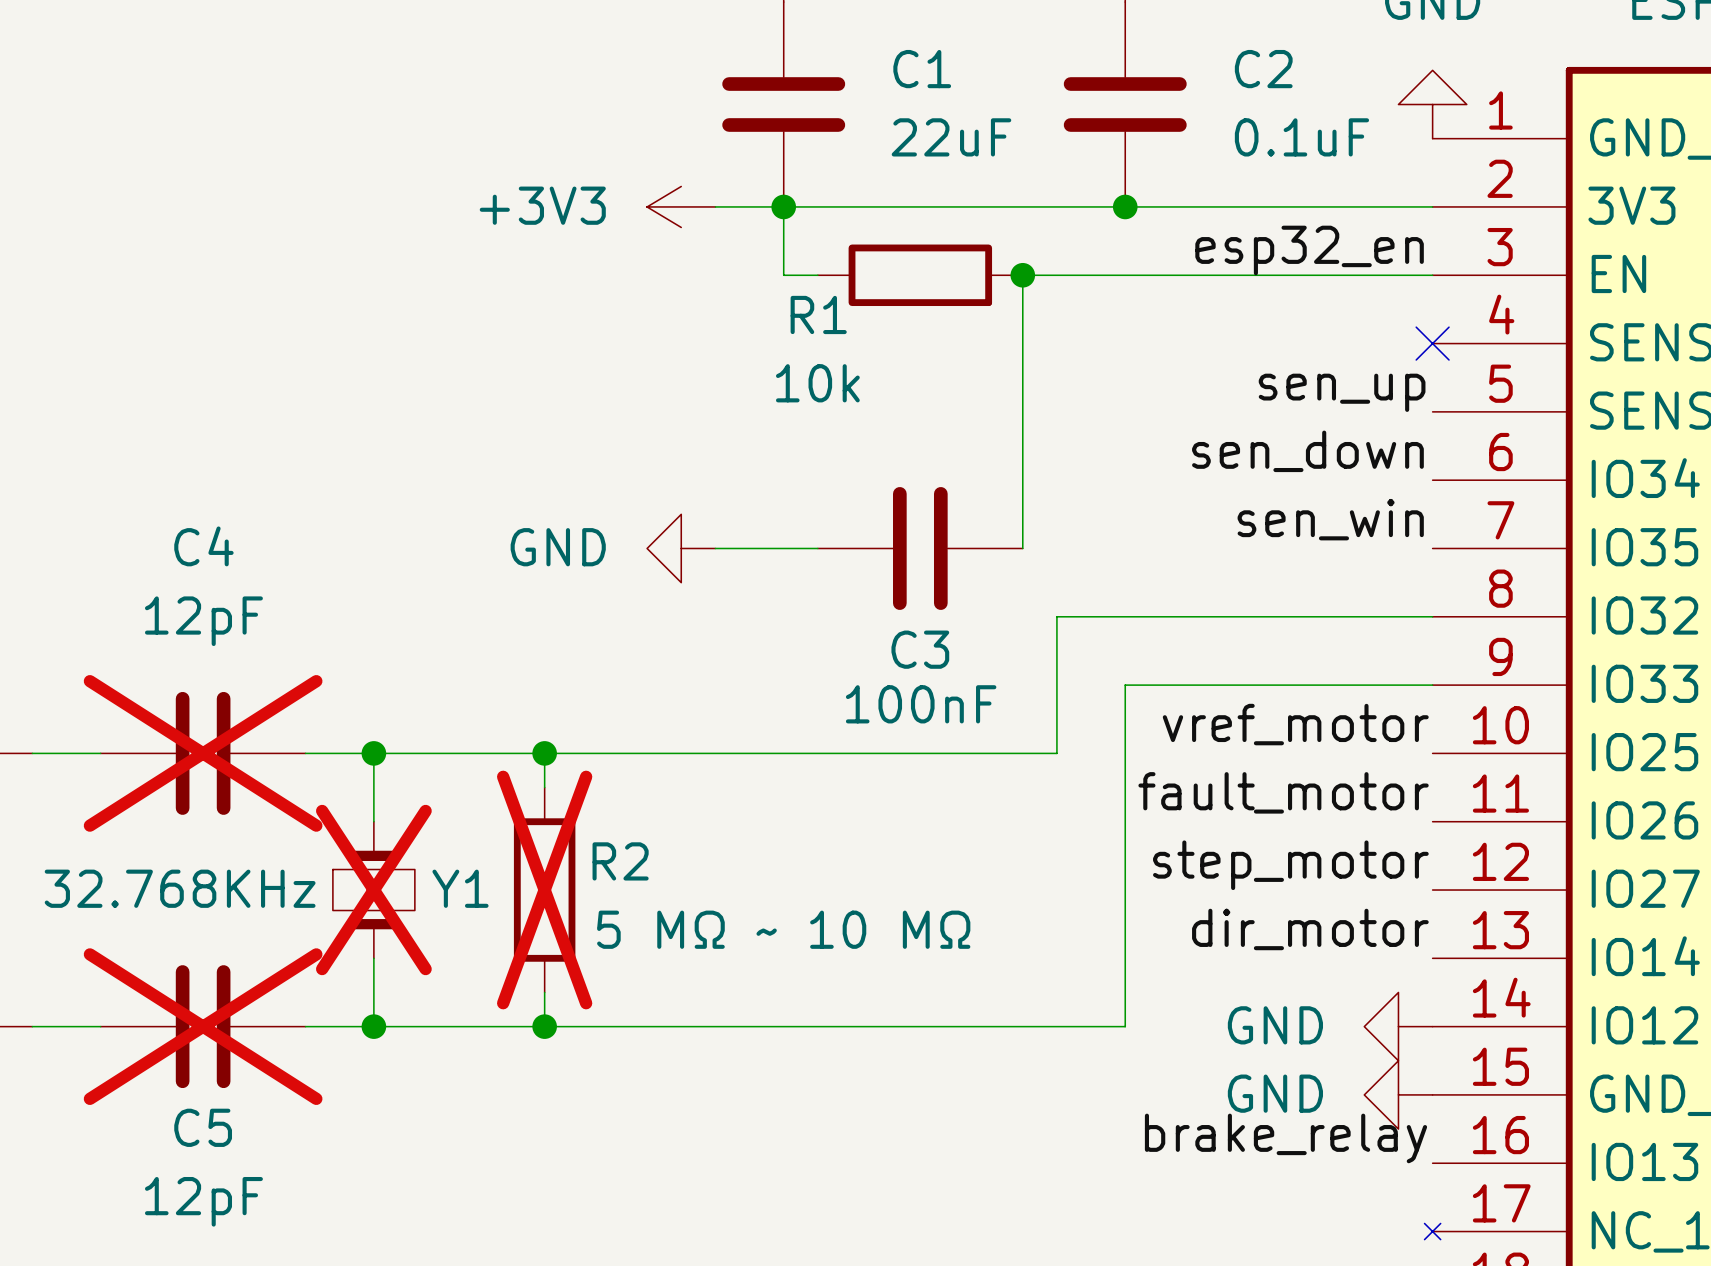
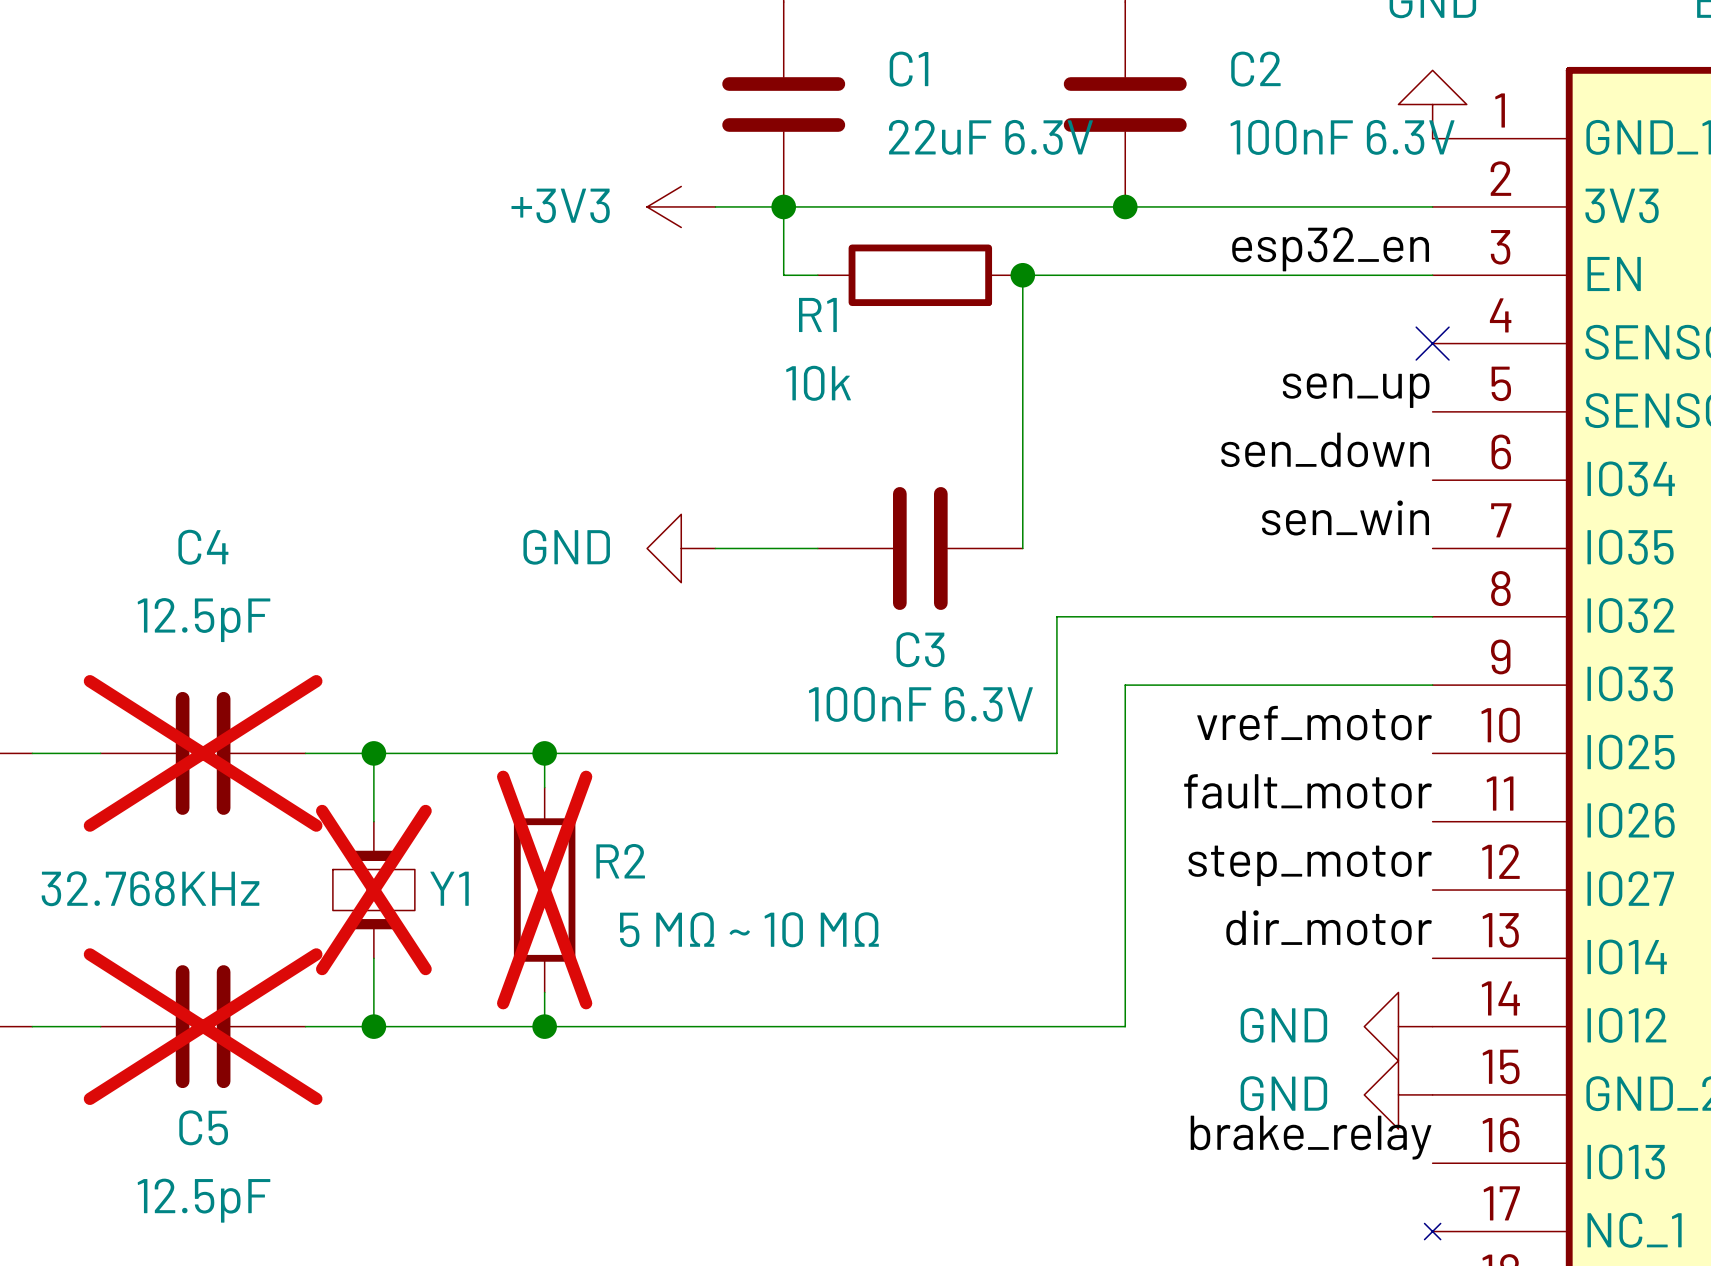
C1 value: 22uF (951, 137) -> 22uF 6.3V (991, 137)
C2 value: 0.1uF (1301, 137) -> 100nF 6.3V (1342, 137)
C4 value: 12pF (203, 621) -> 12.5pF (204, 620)
C3 value: 100nF (921, 704) -> 100nF 6.3V (920, 704)
R2 value position: 5 MΩ ~ 10 MΩ (783, 929) -> 5 MΩ ~ 10 MΩ (749, 929)
C5 value: 12pF (203, 1201) -> 12.5pF (204, 1200)

